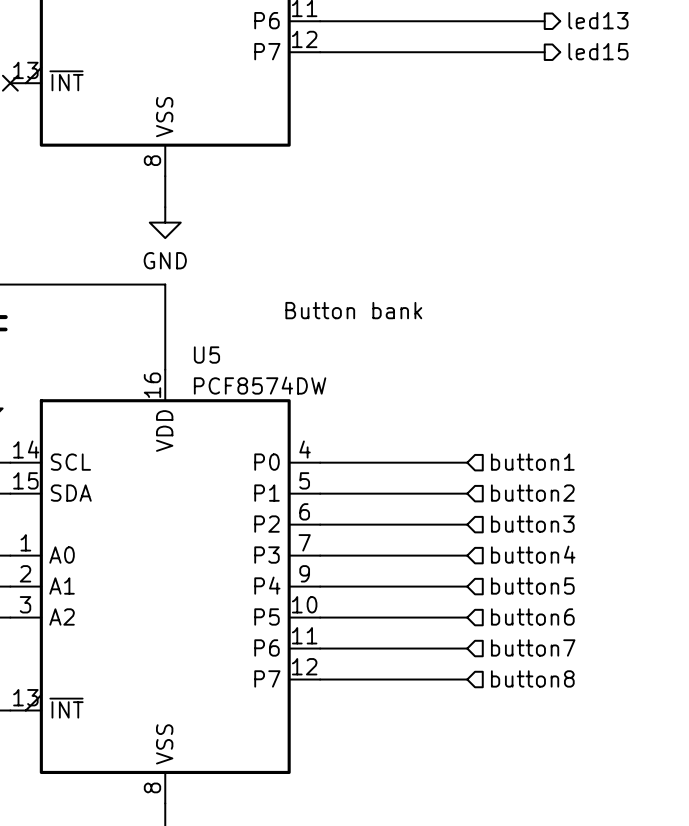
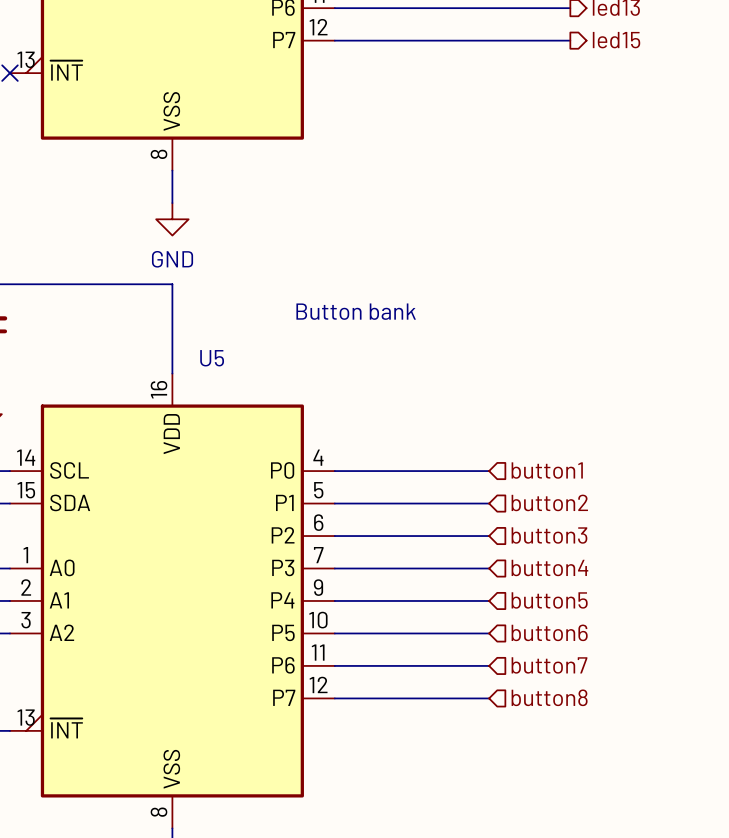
U5 value: PCF8574DW (260, 385) -> none

